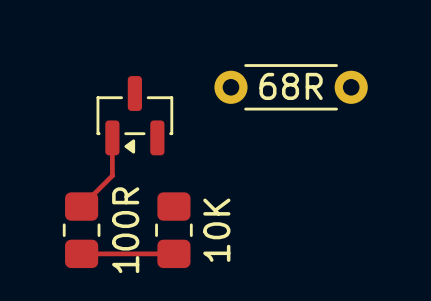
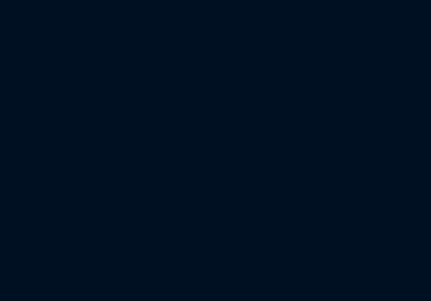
part: 68R (291, 87) -> none
part: (134, 115) -> none
track: (112, 137) (112, 175) (81, 206) -> none
part: 100R (81, 230) -> none
part: 10K (173, 230) -> none
track: (81, 253) (173, 253) -> none

